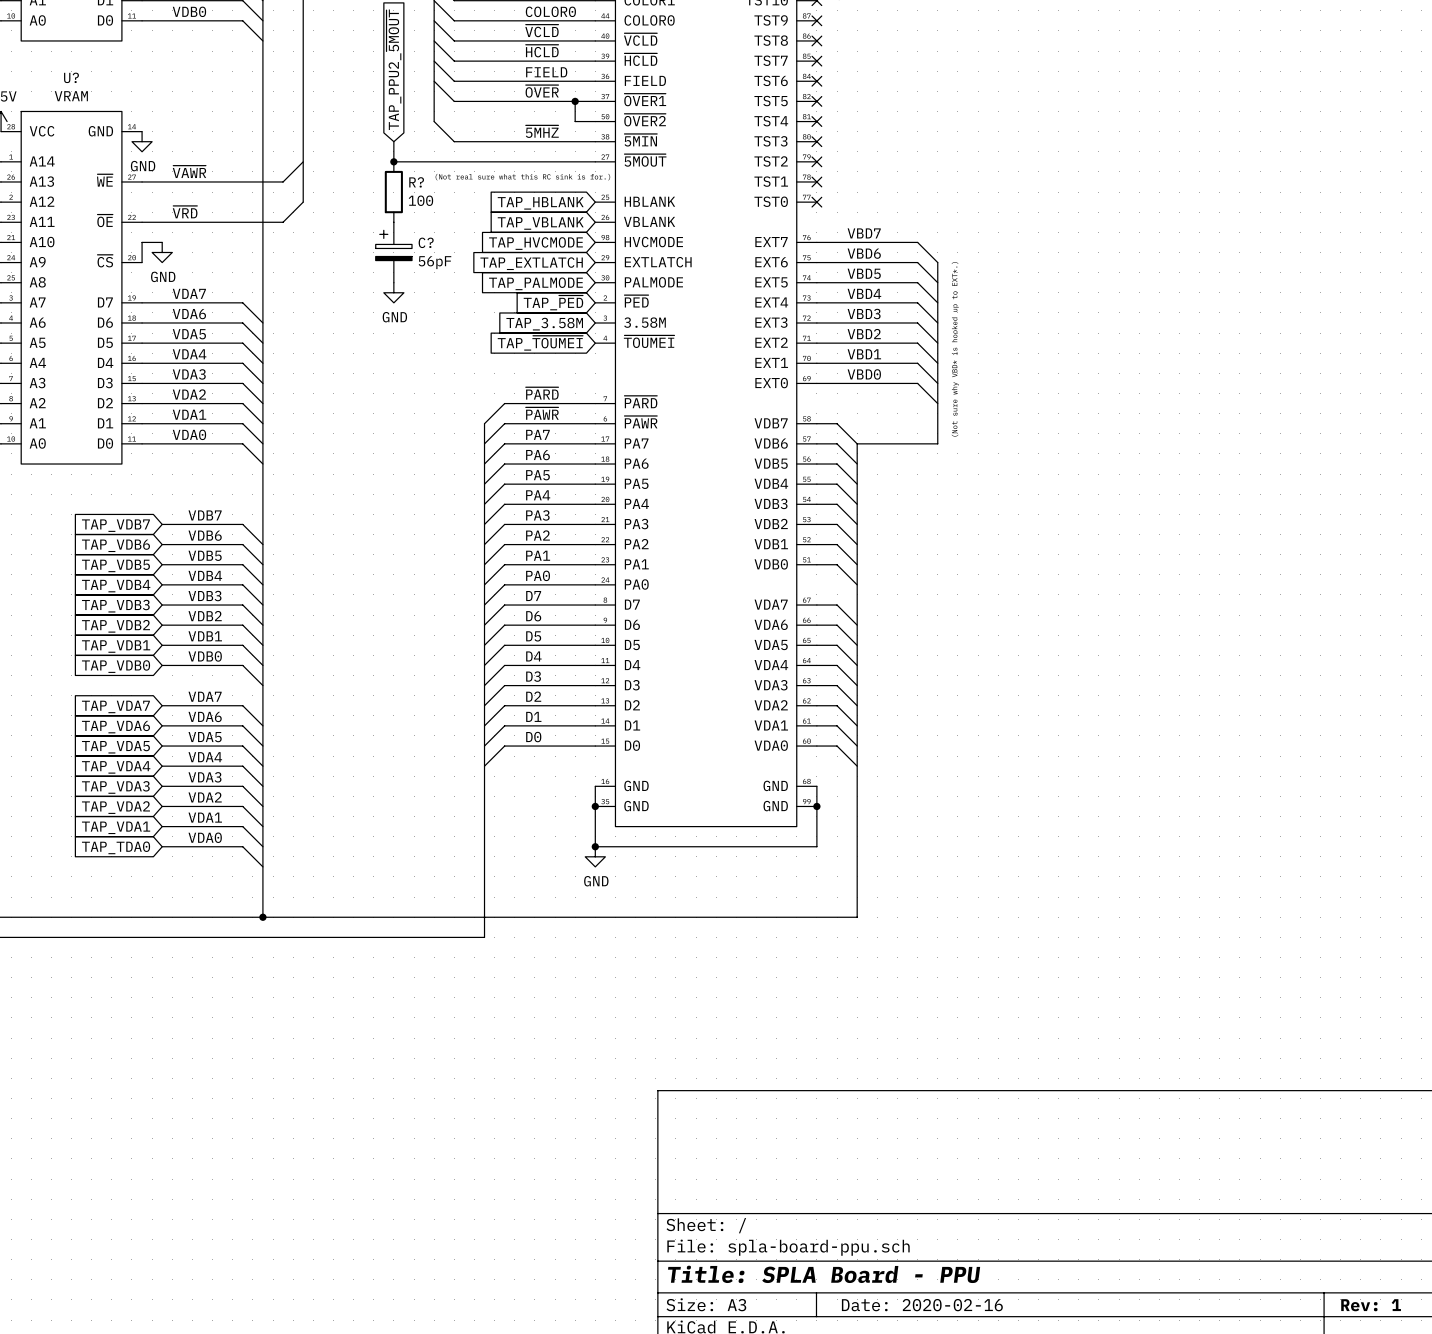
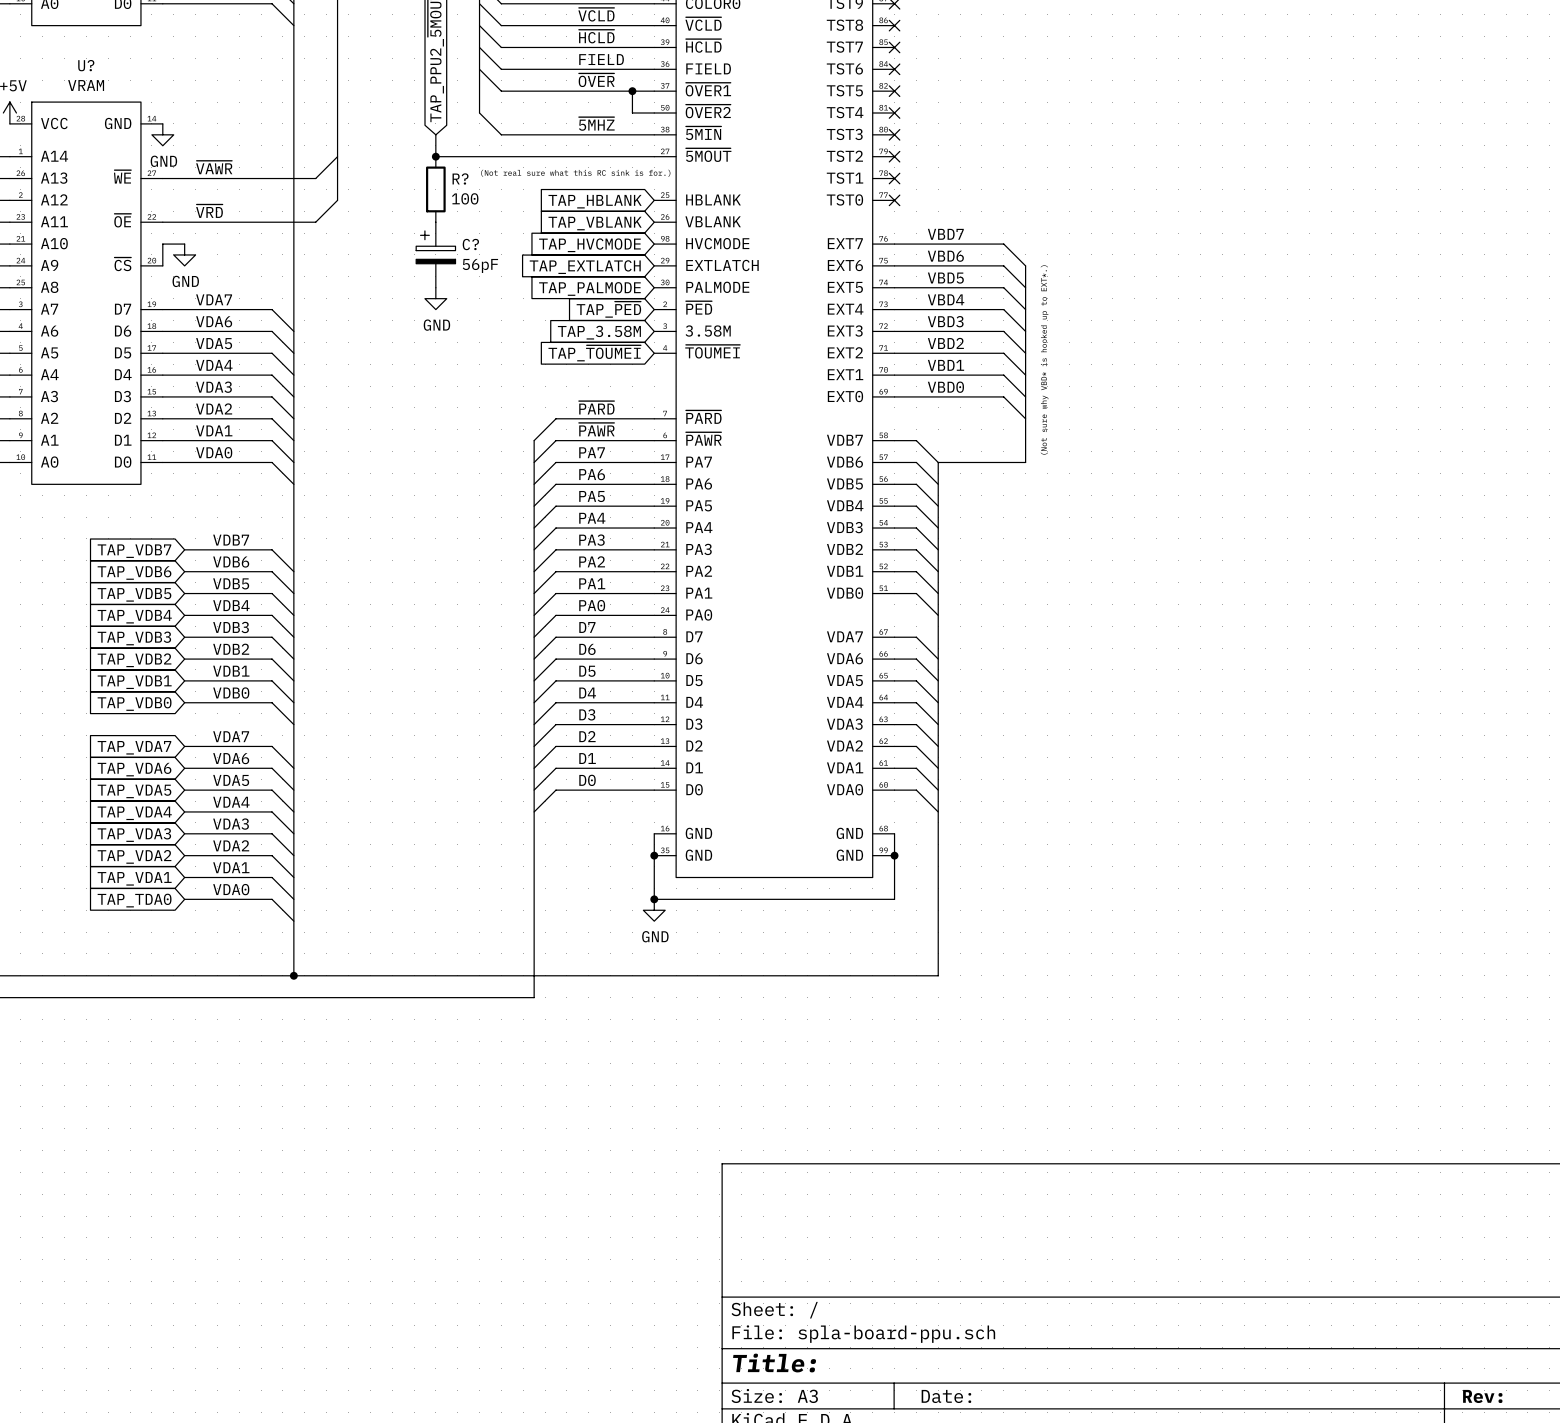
title block: Title: SPLA Board - PPU (824, 1274) -> Title: (774, 1363)
title block: Date: 2020-02-16 (922, 1305) -> Date: (946, 1396)
title block: Rev: 1 (1371, 1305) -> Rev: (1482, 1396)

